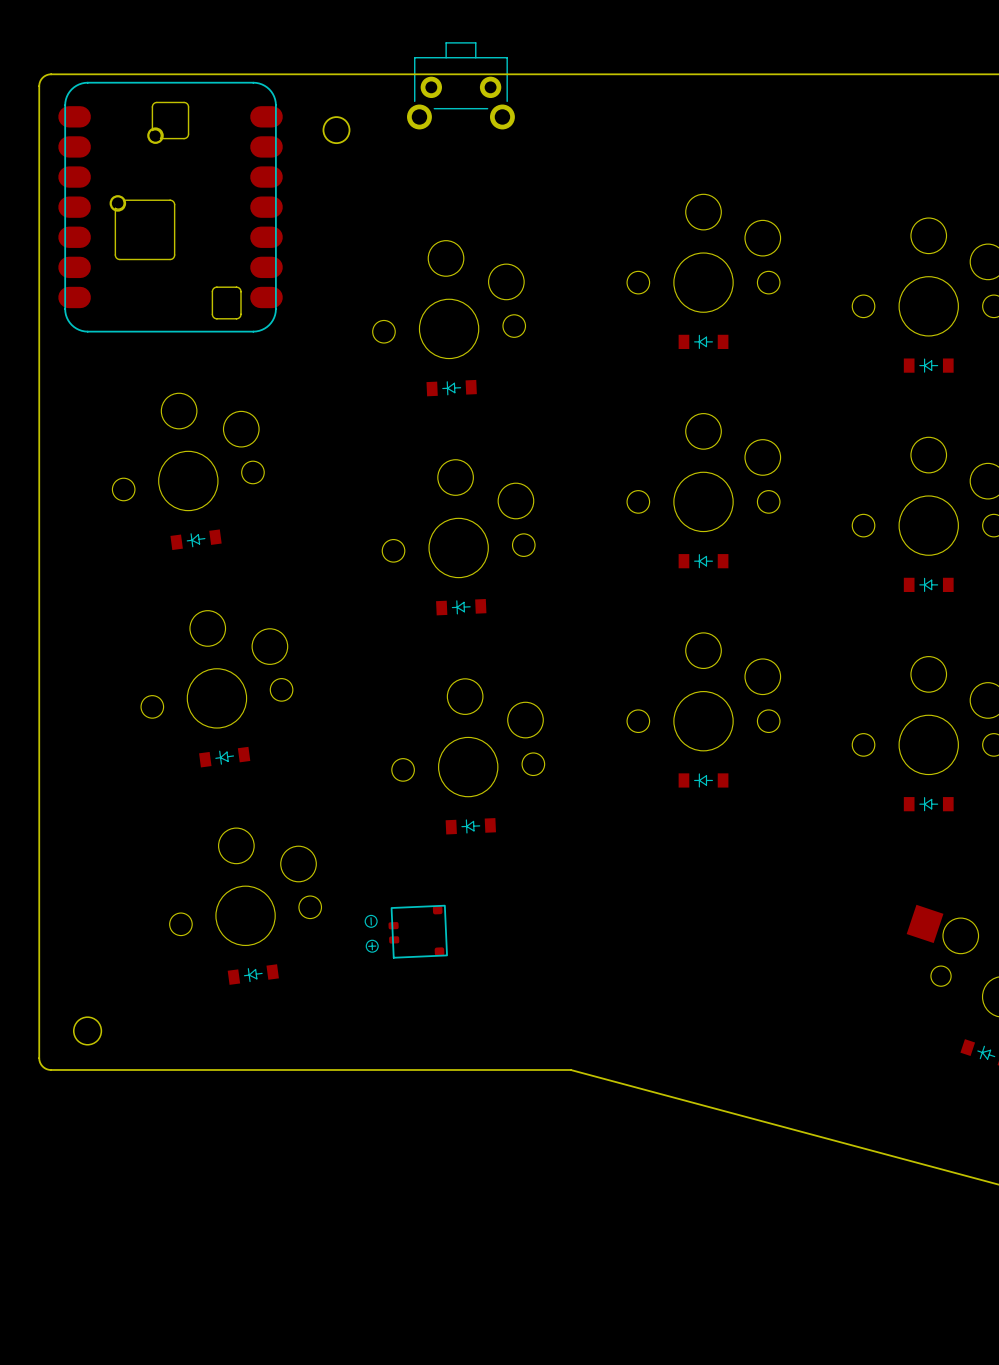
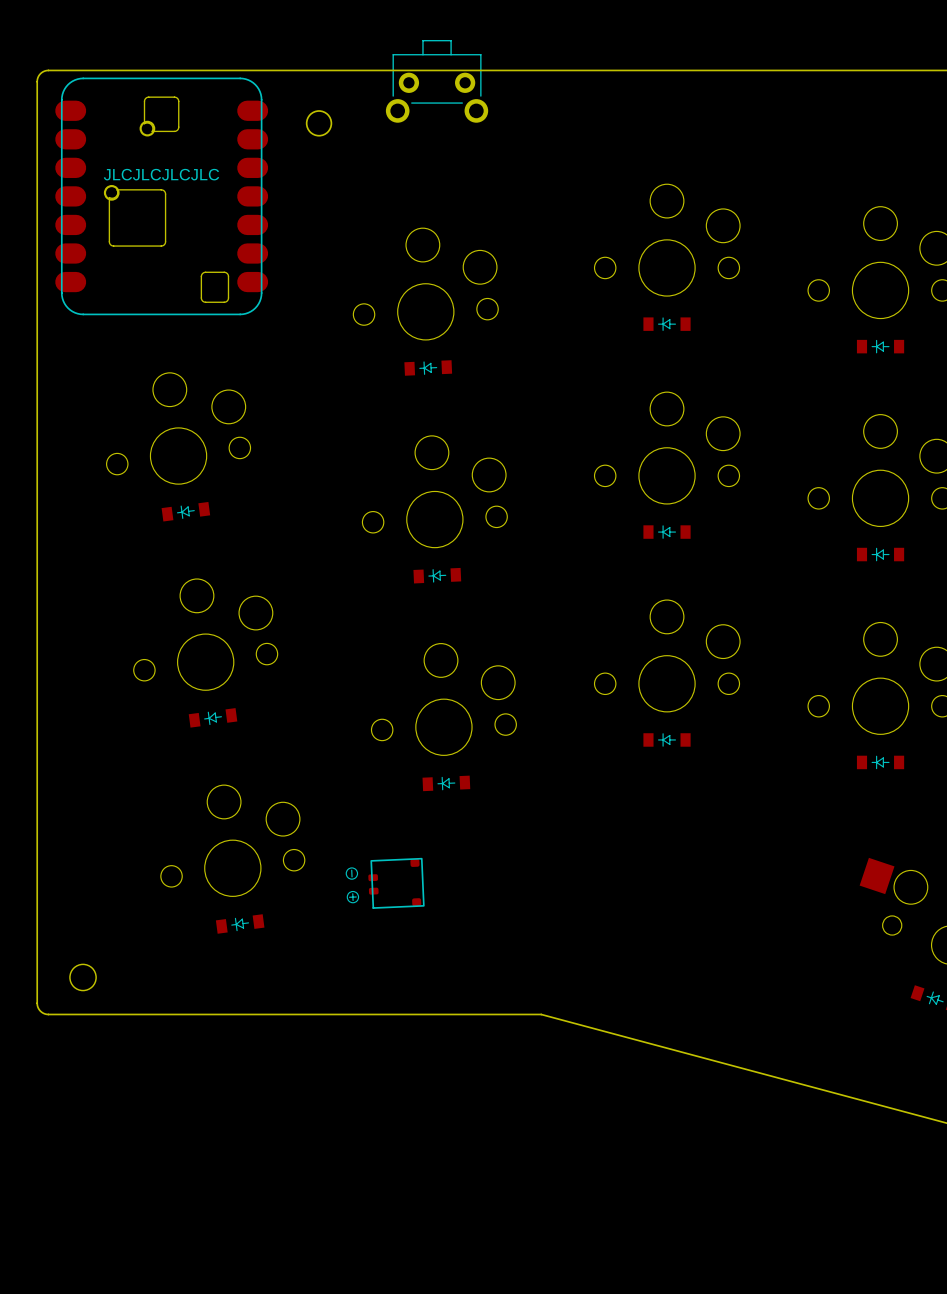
text: none -> JLCJLCJLCJLC (161, 174)

